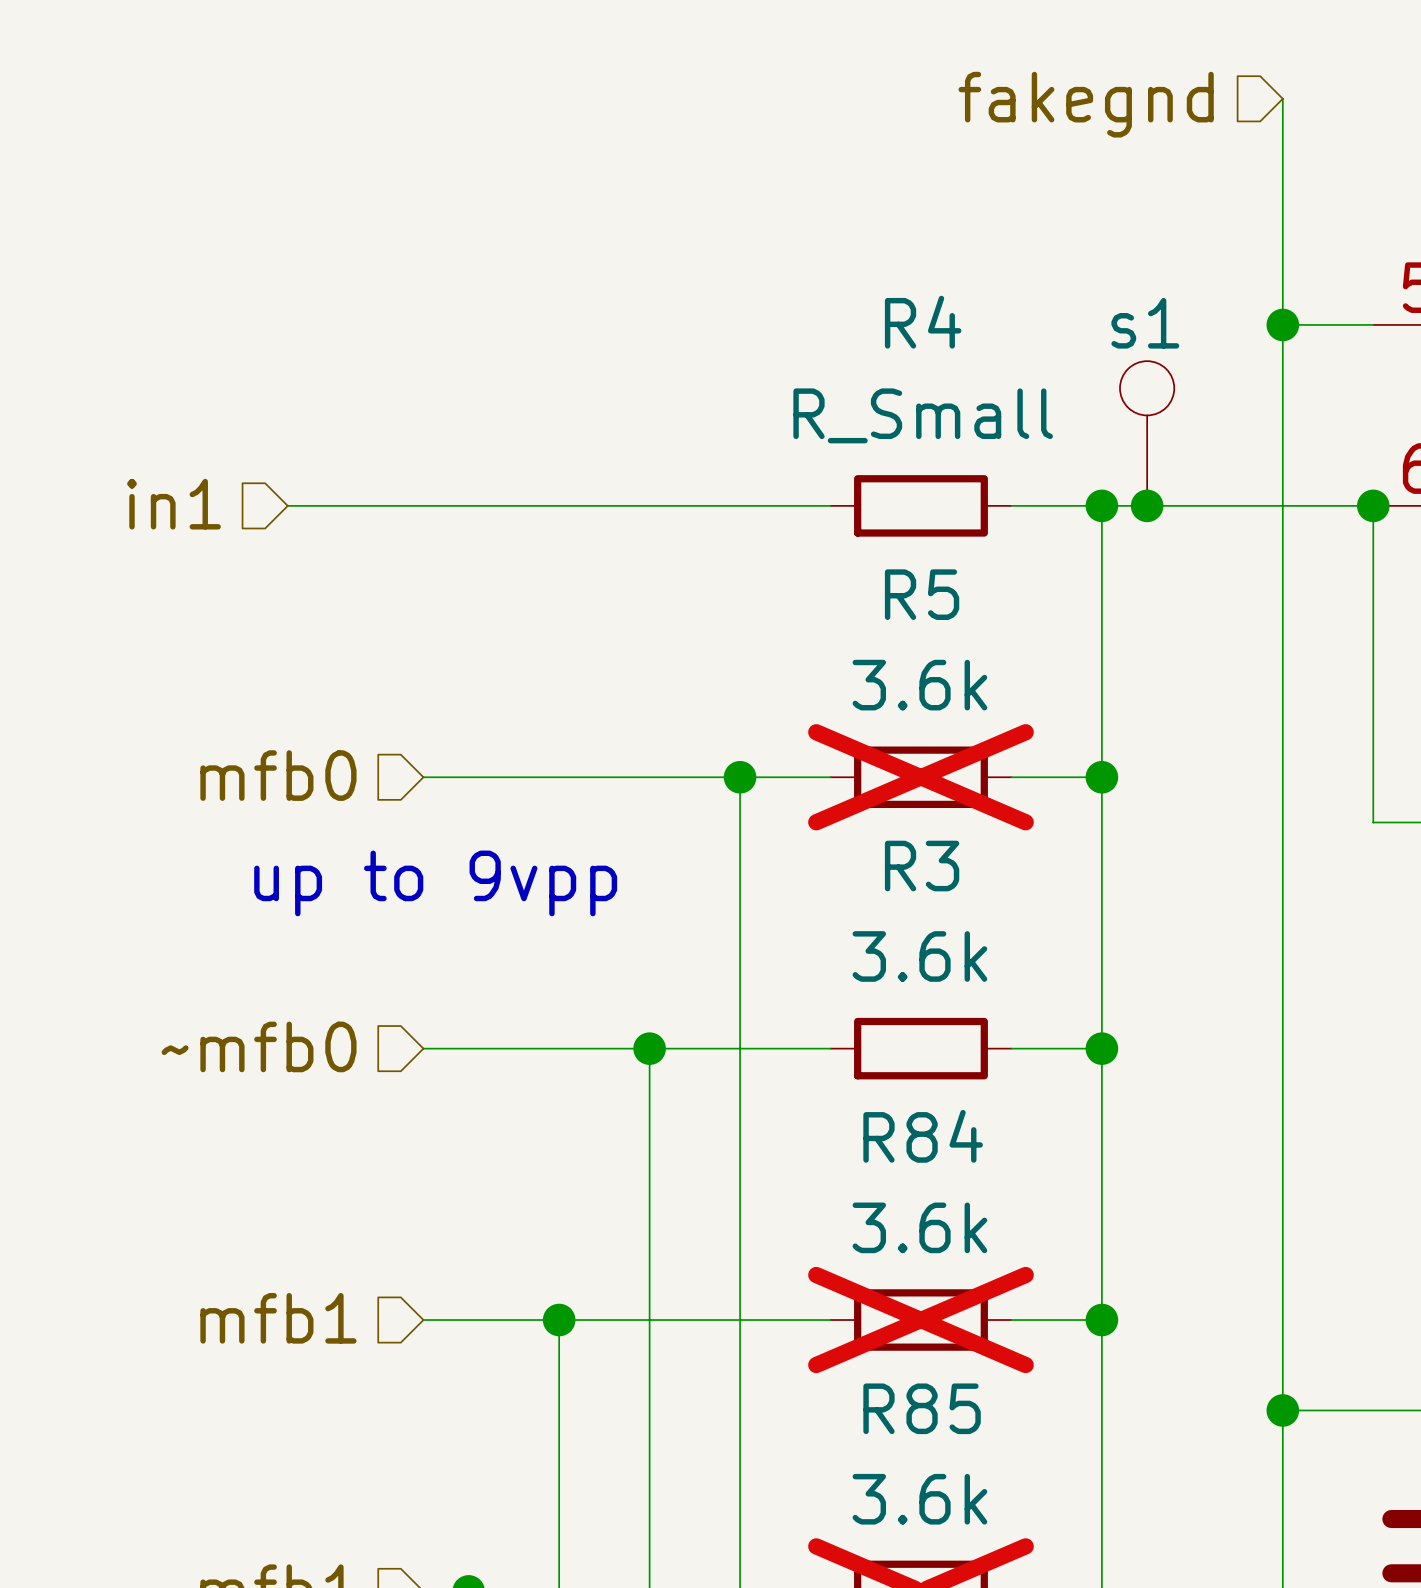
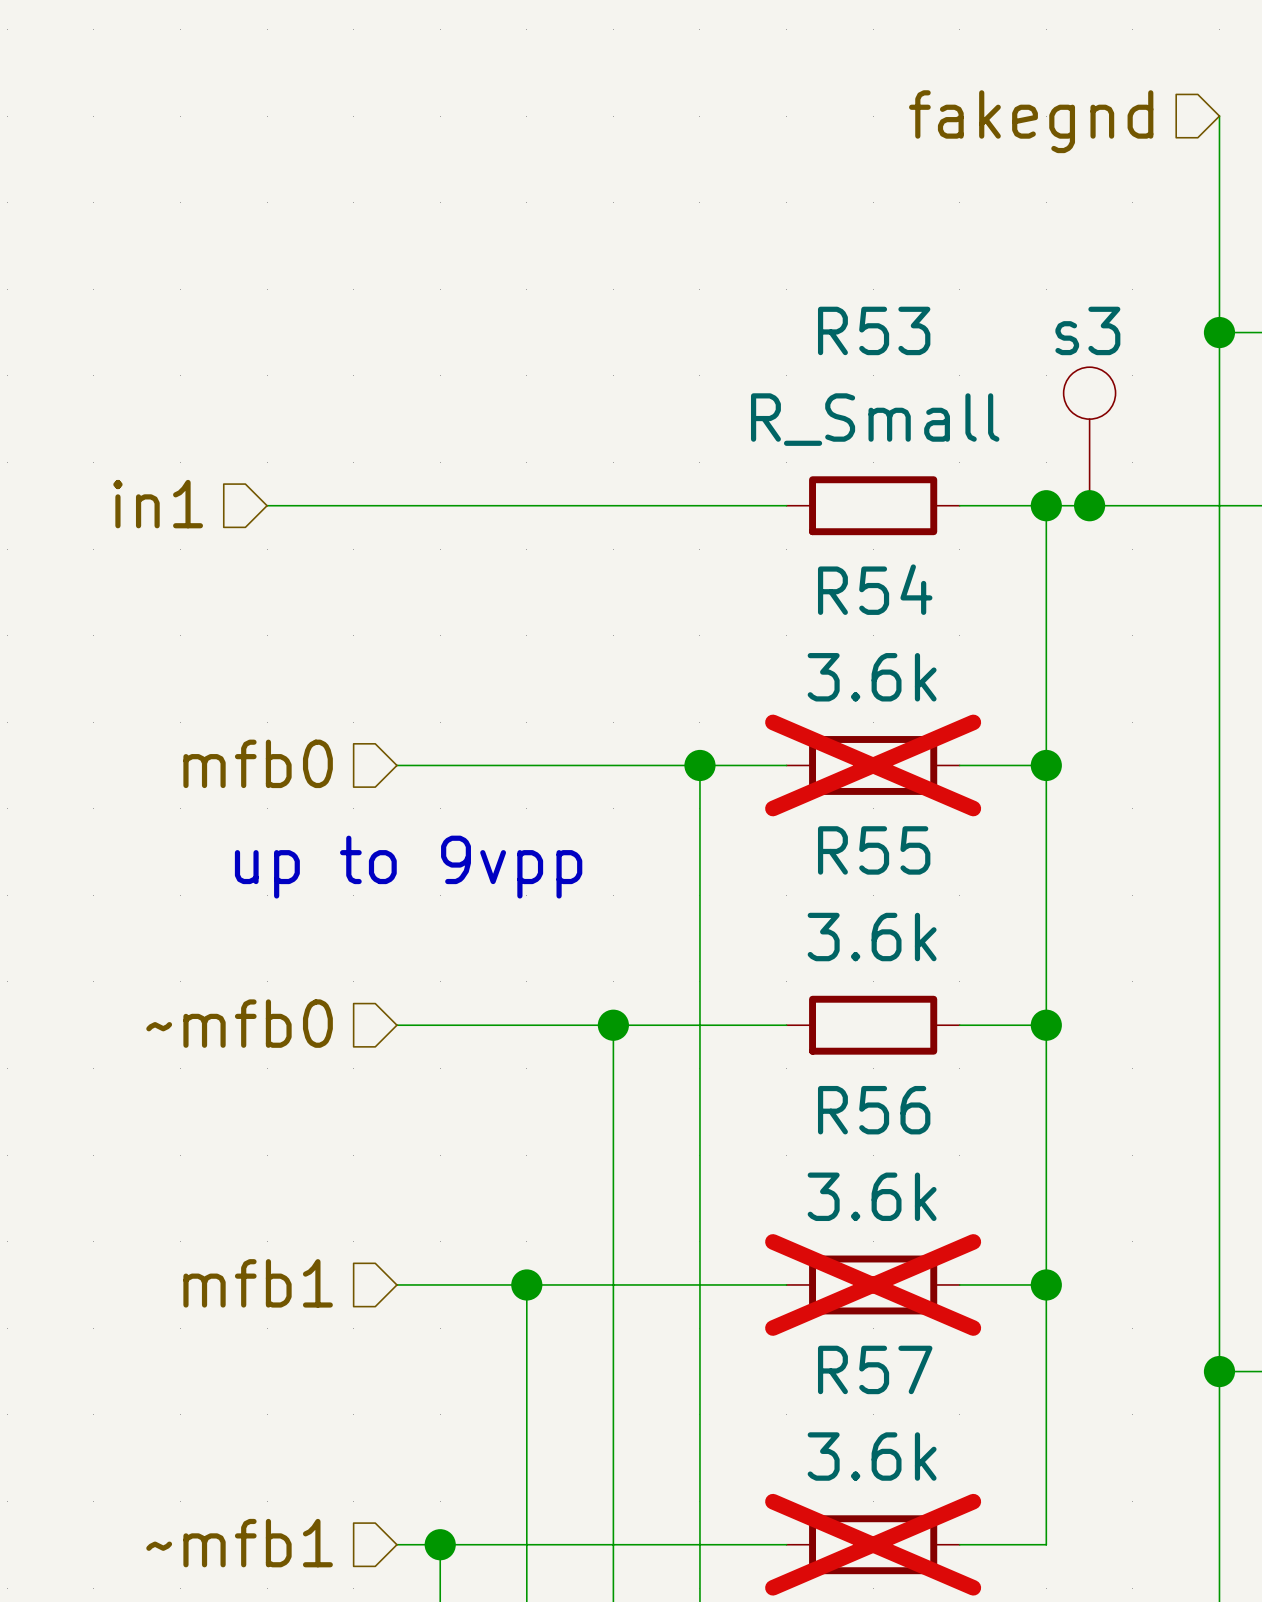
R4 name: R4 (923, 322) -> R53 (874, 330)
s1 name: s1 (1145, 323) -> s3 (1087, 330)
R5 name: R5 (922, 594) -> R54 (875, 589)
R3 name: R3 (922, 866) -> R55 (874, 850)
R84 name: R84 (923, 1136) -> R56 (874, 1110)
R85 name: R85 (922, 1408) -> R57 (875, 1369)

